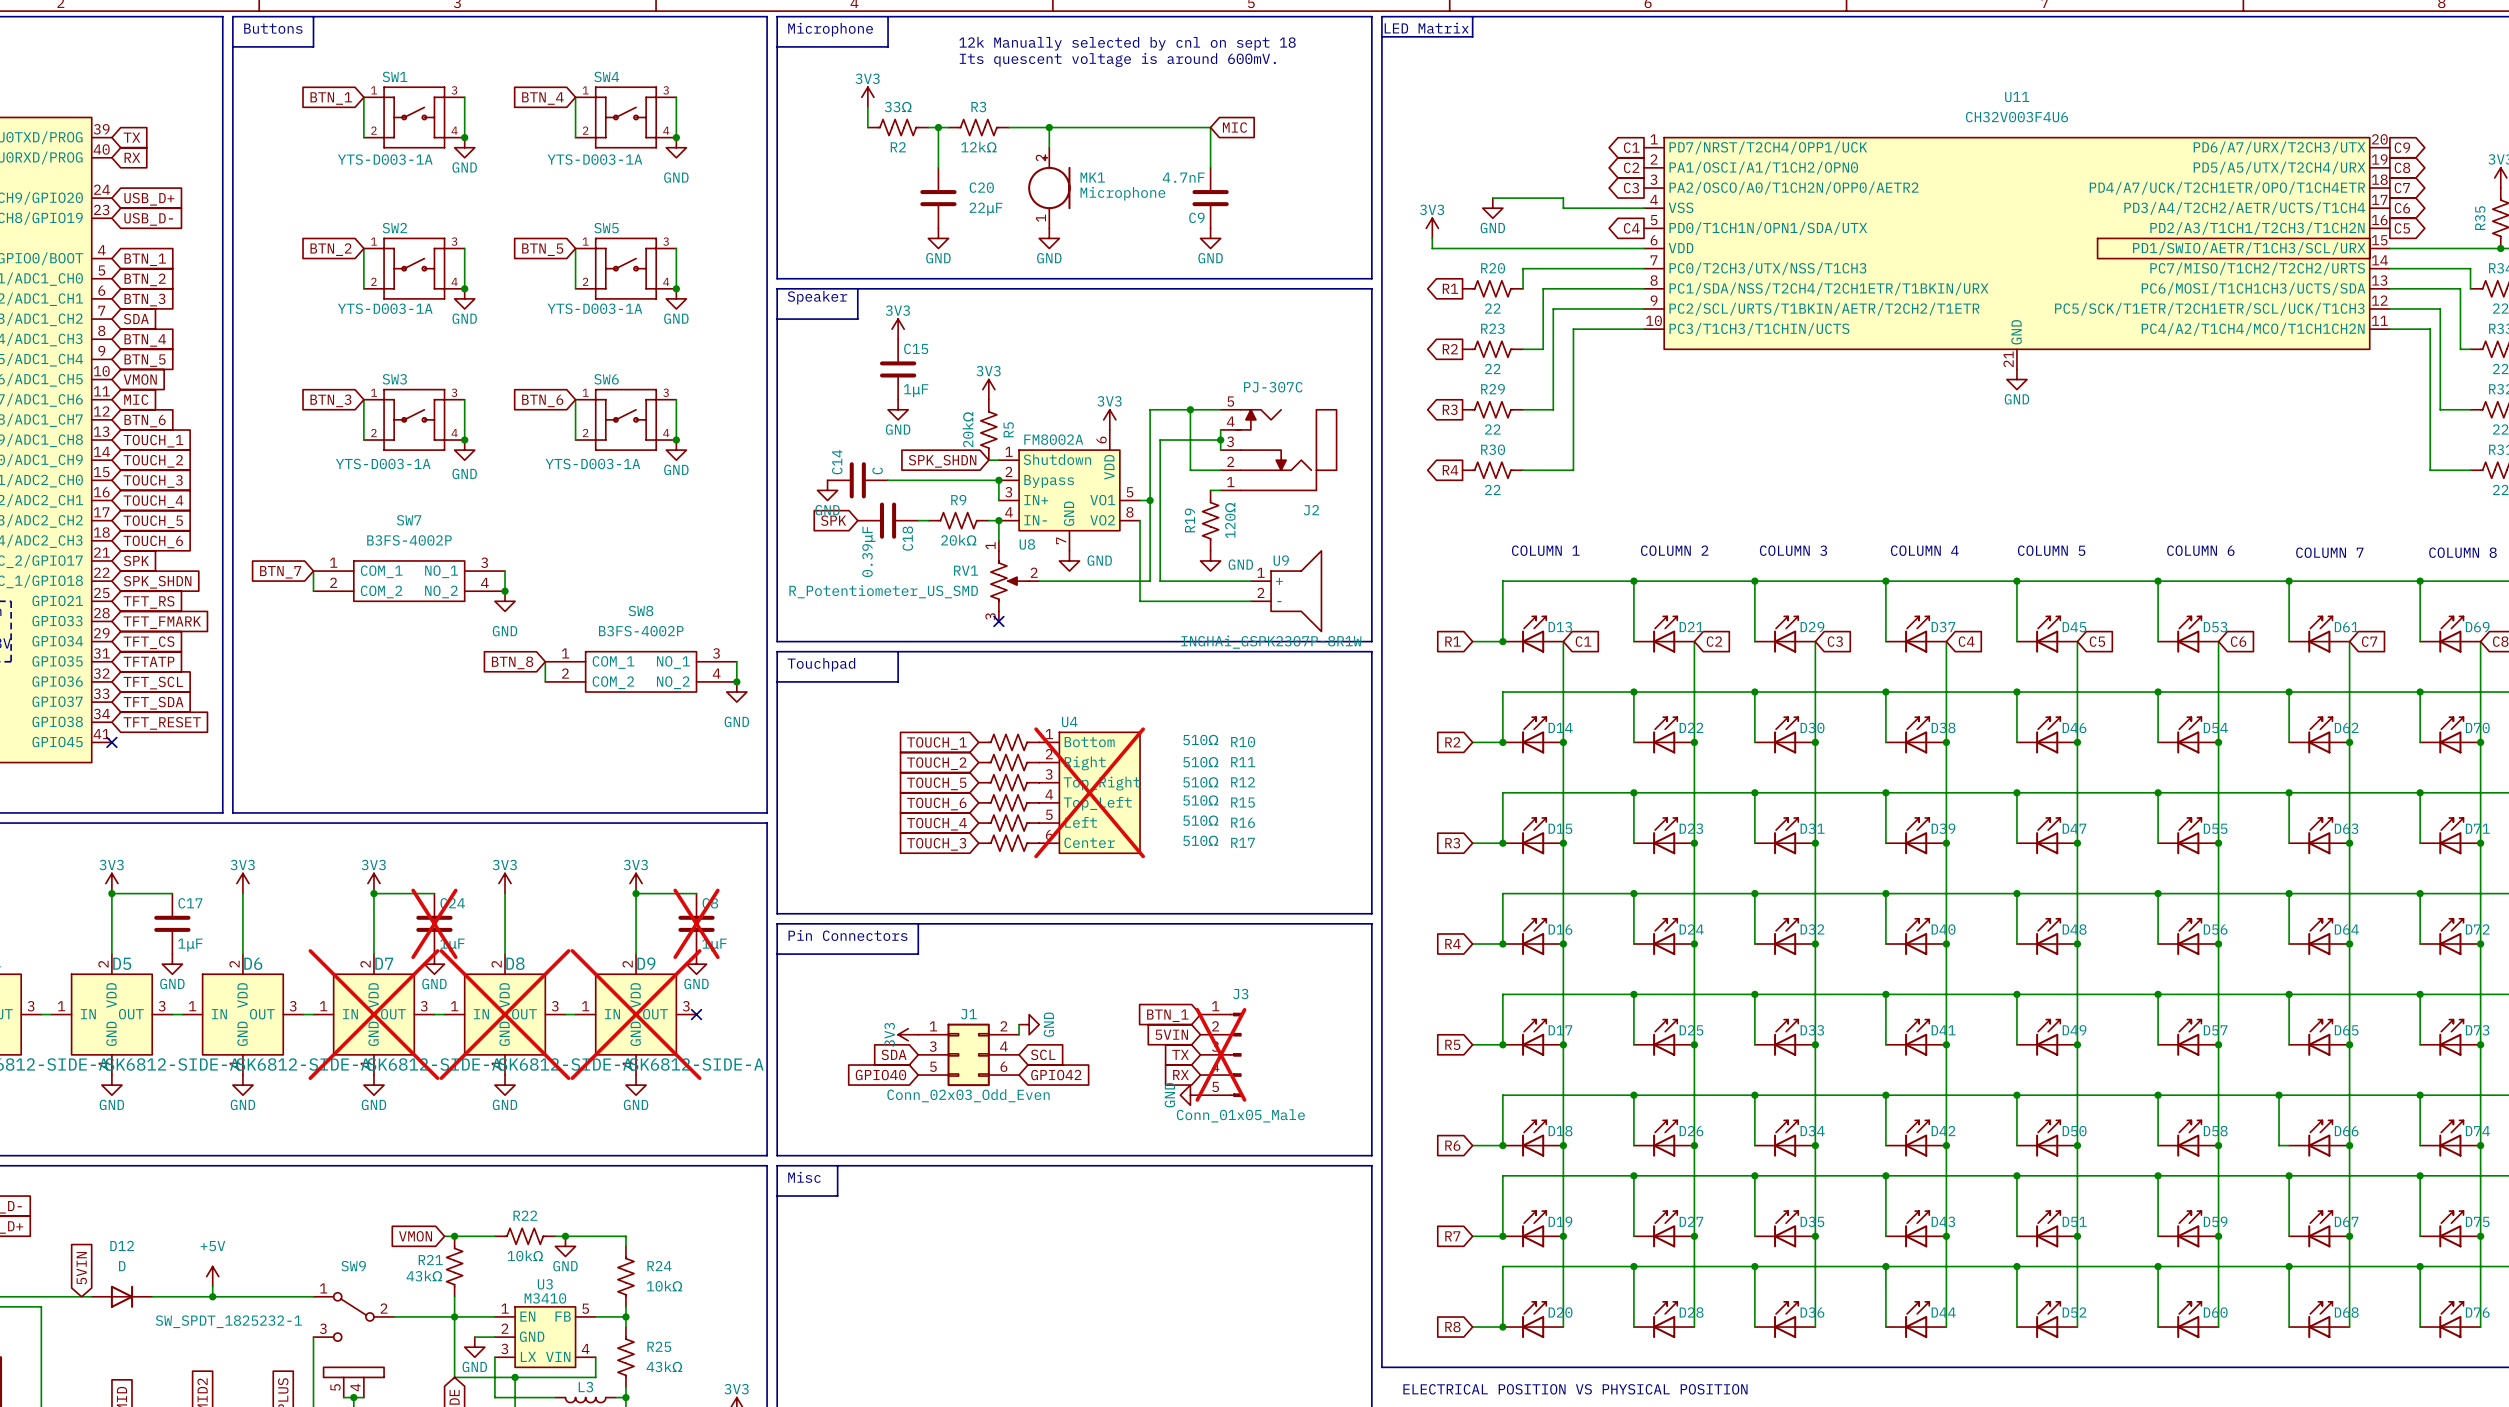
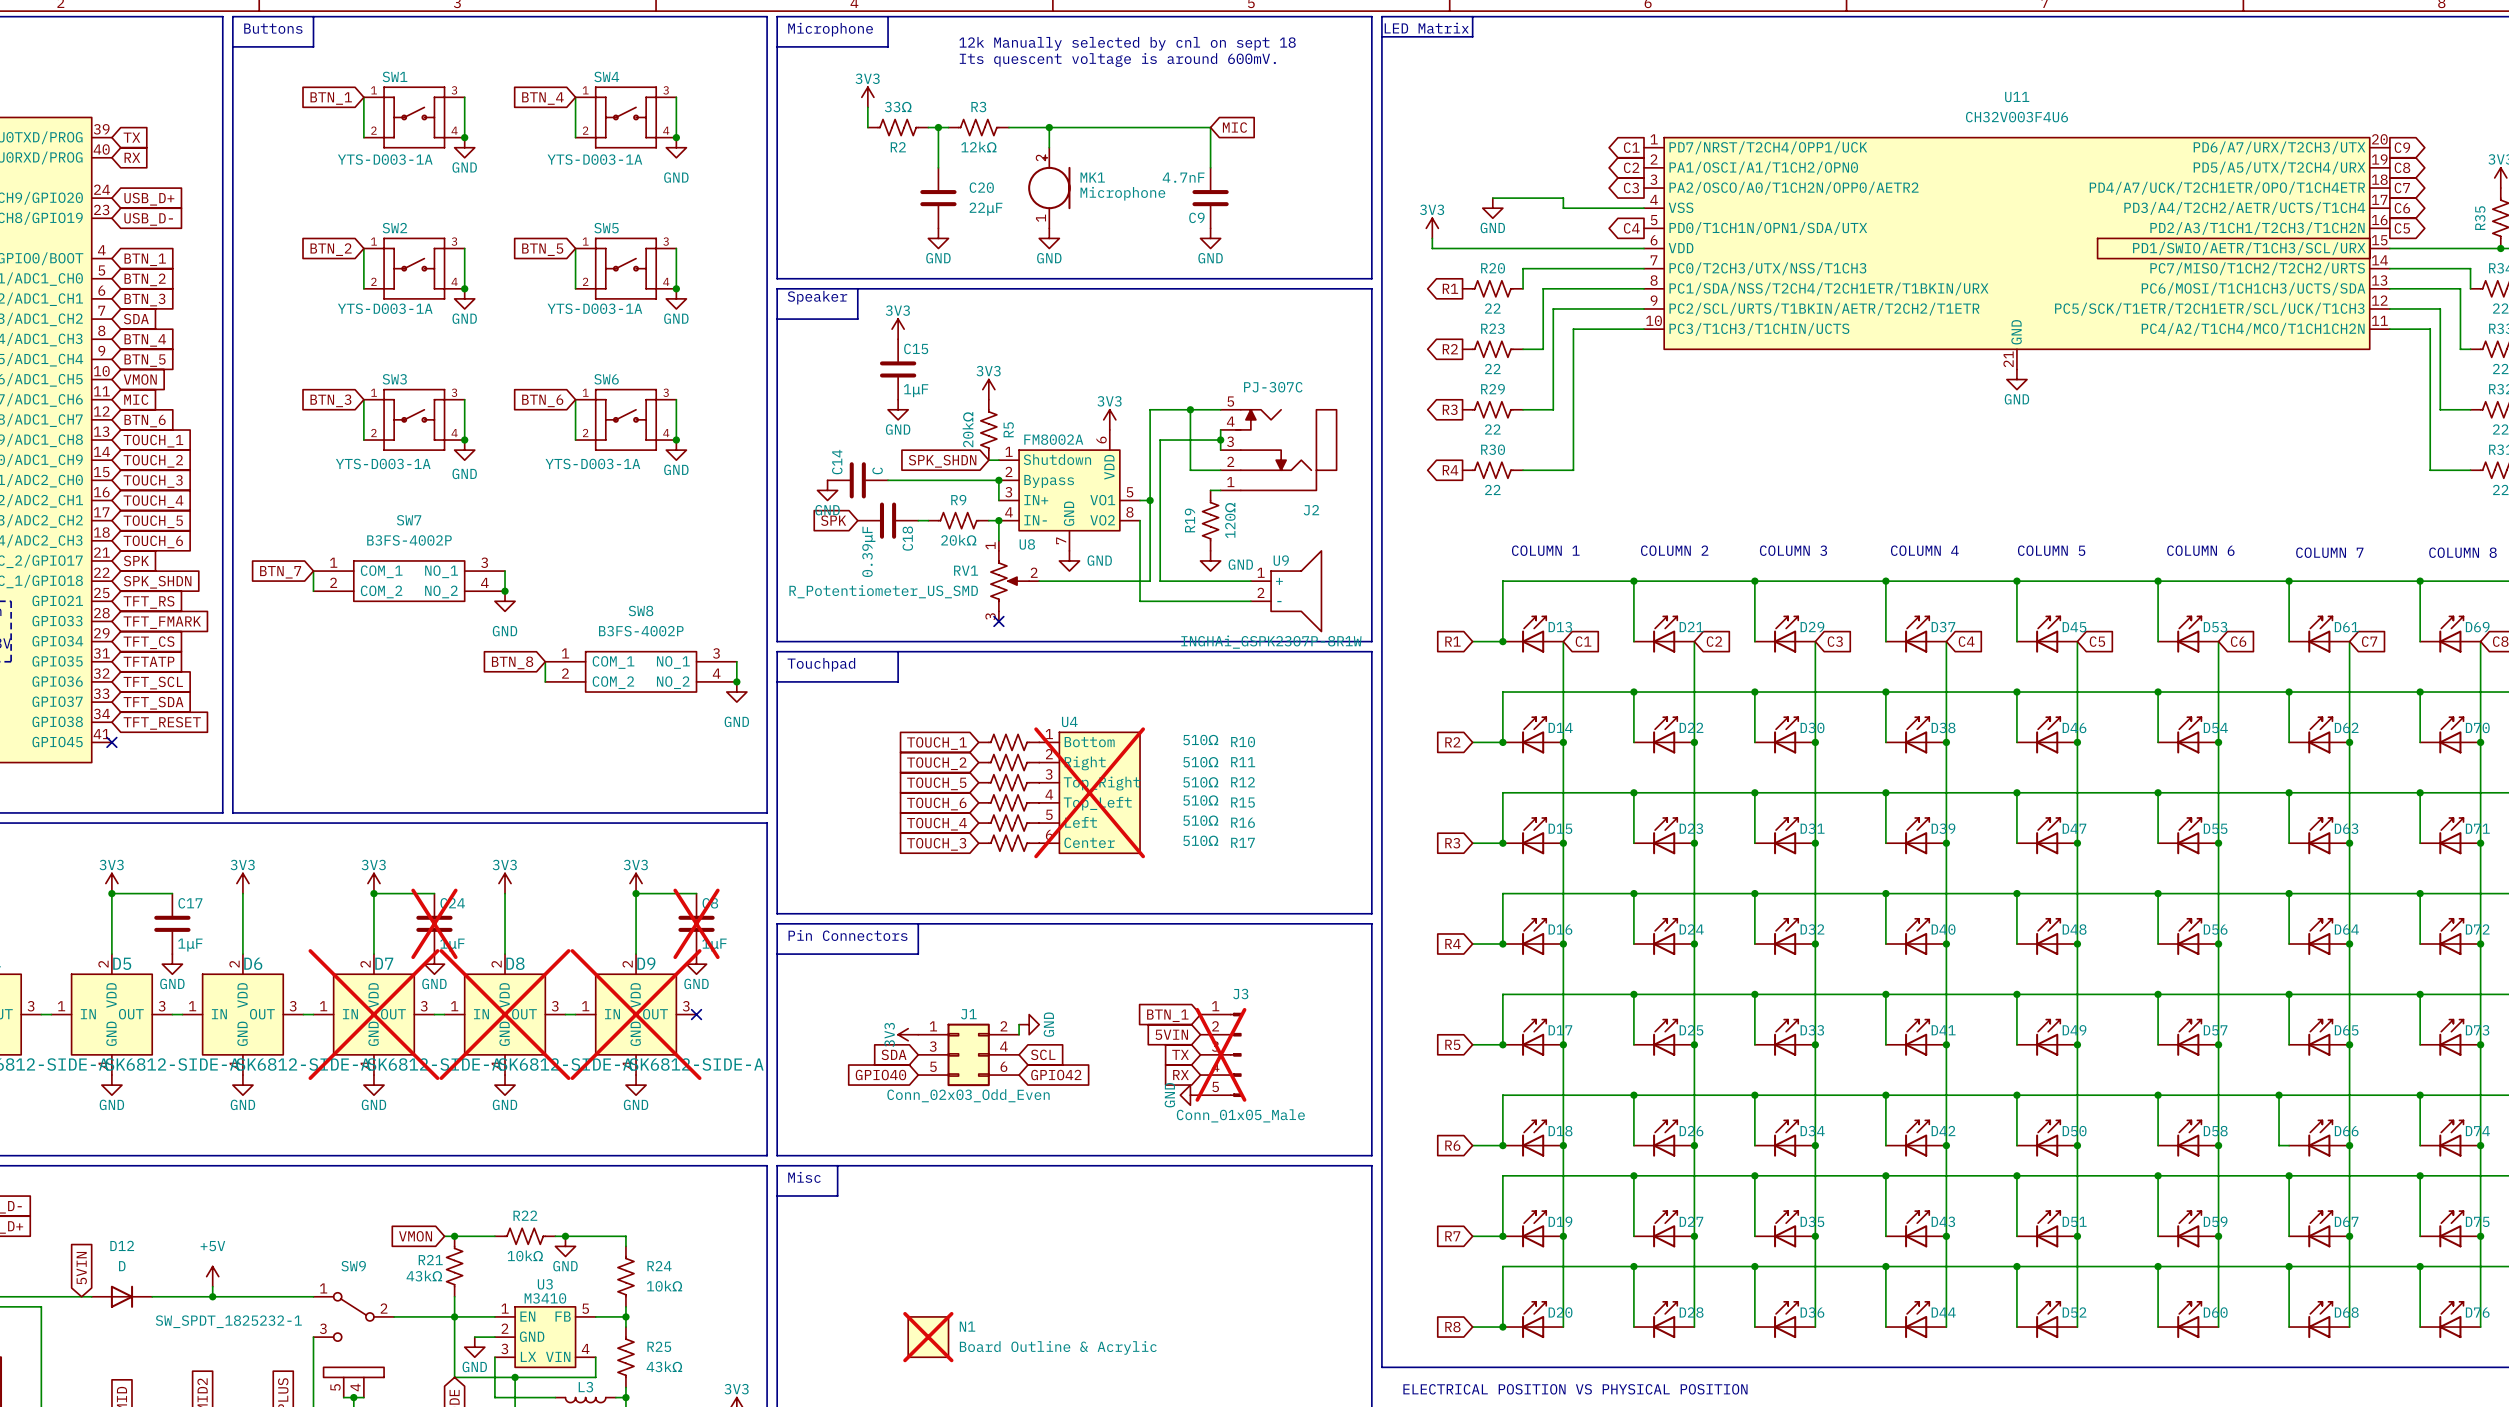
N1: none -> Board Outline & Acrylic (928, 1337)

